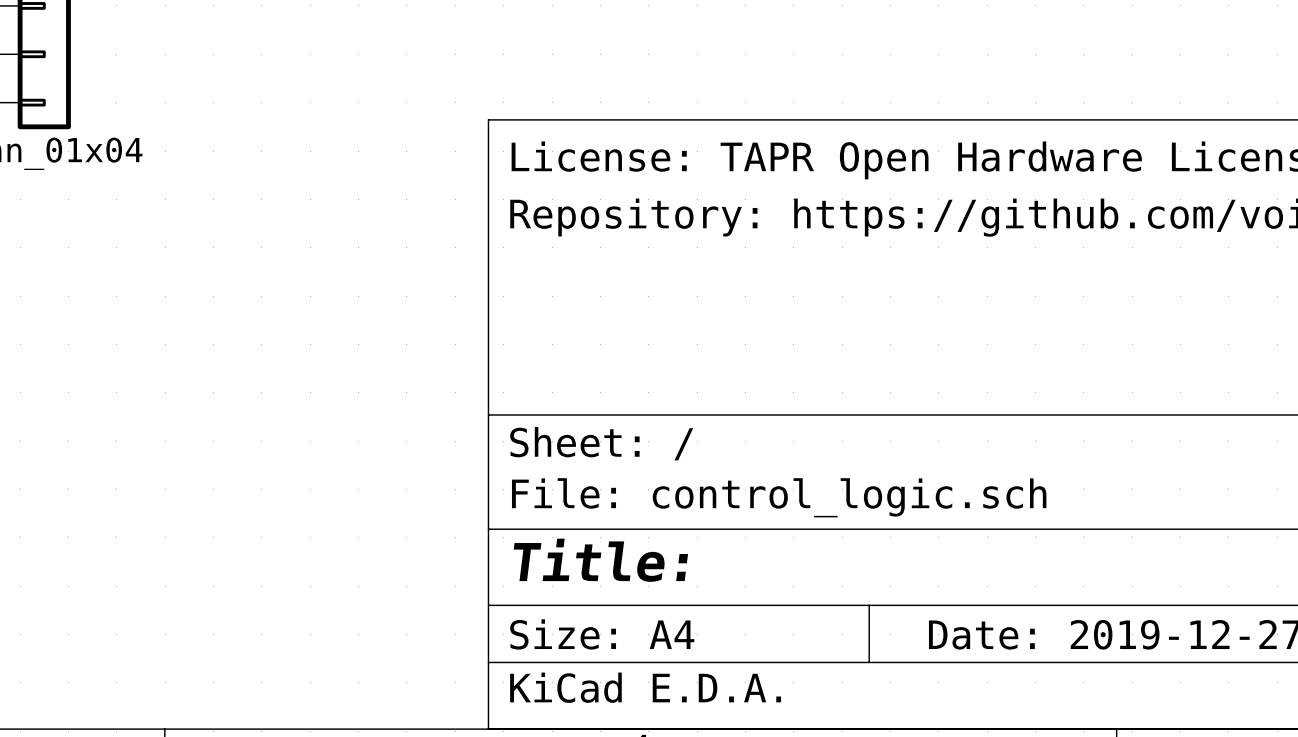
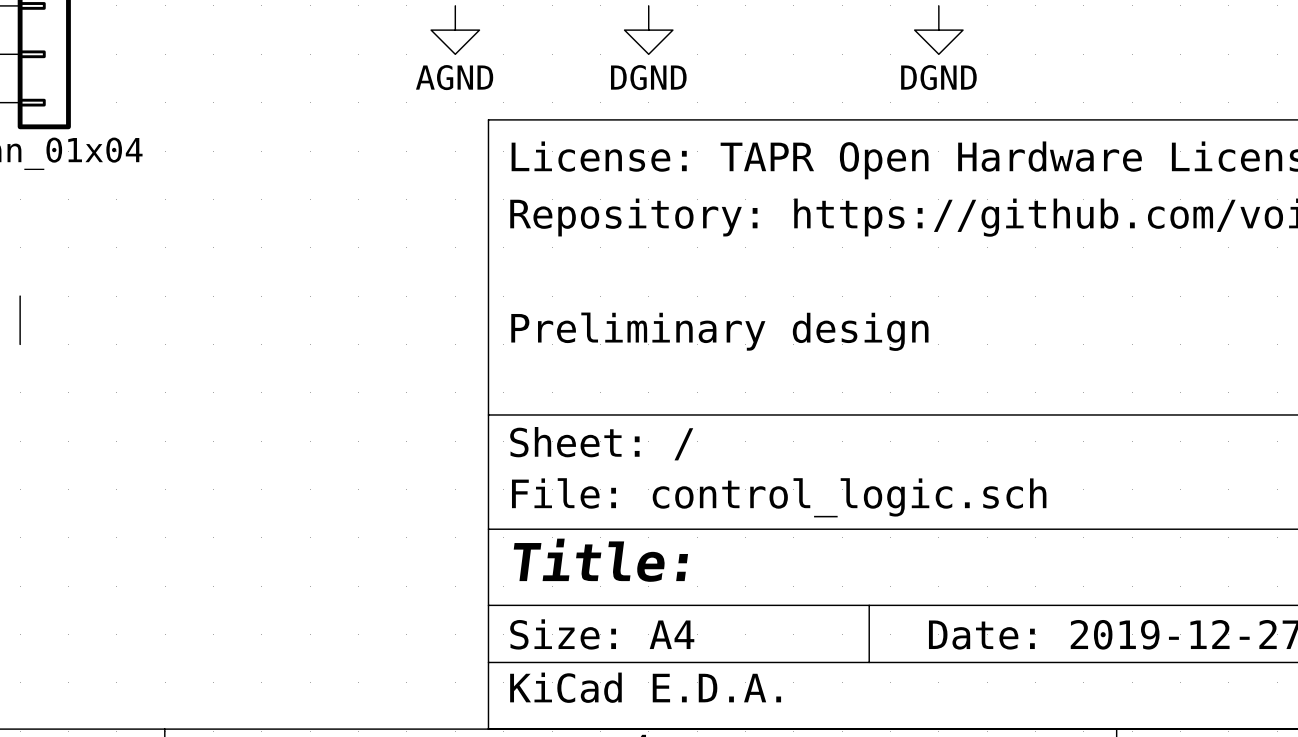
power symbol: none -> AGND (455, 30)
power symbol: none -> DGND (648, 30)
power symbol: none -> DGND (938, 30)
wire: none -> (20, 296) (20, 344)
title block: none -> Preliminary design (719, 331)

